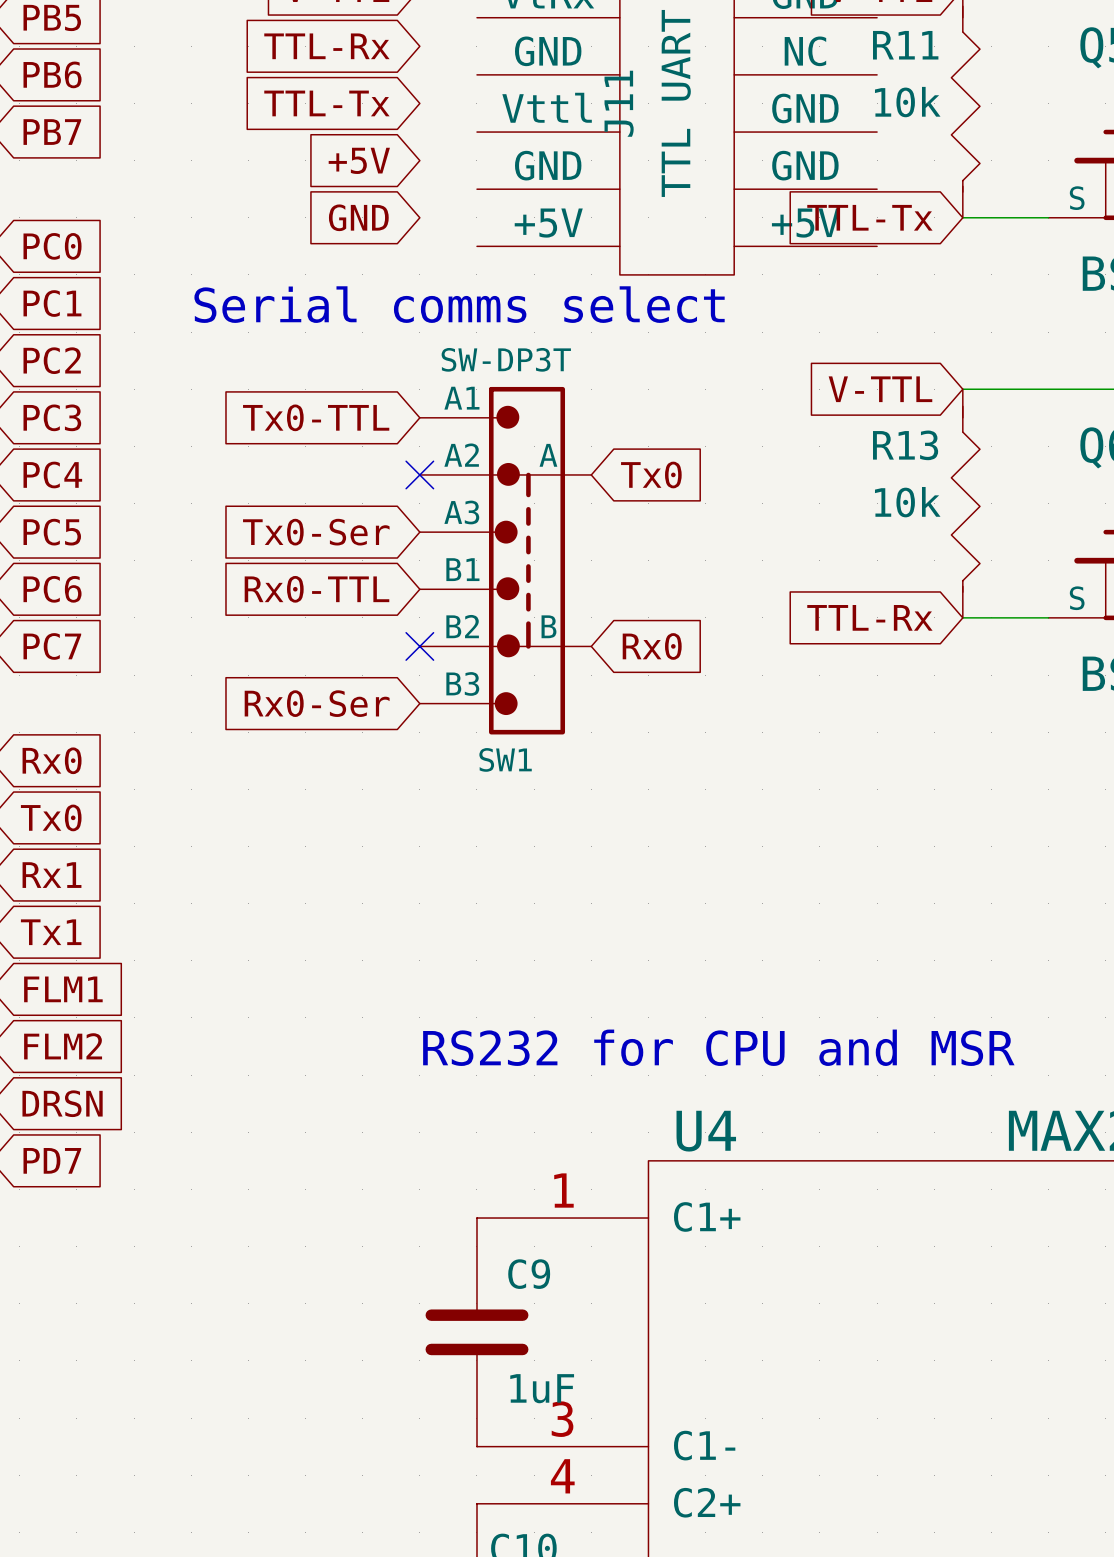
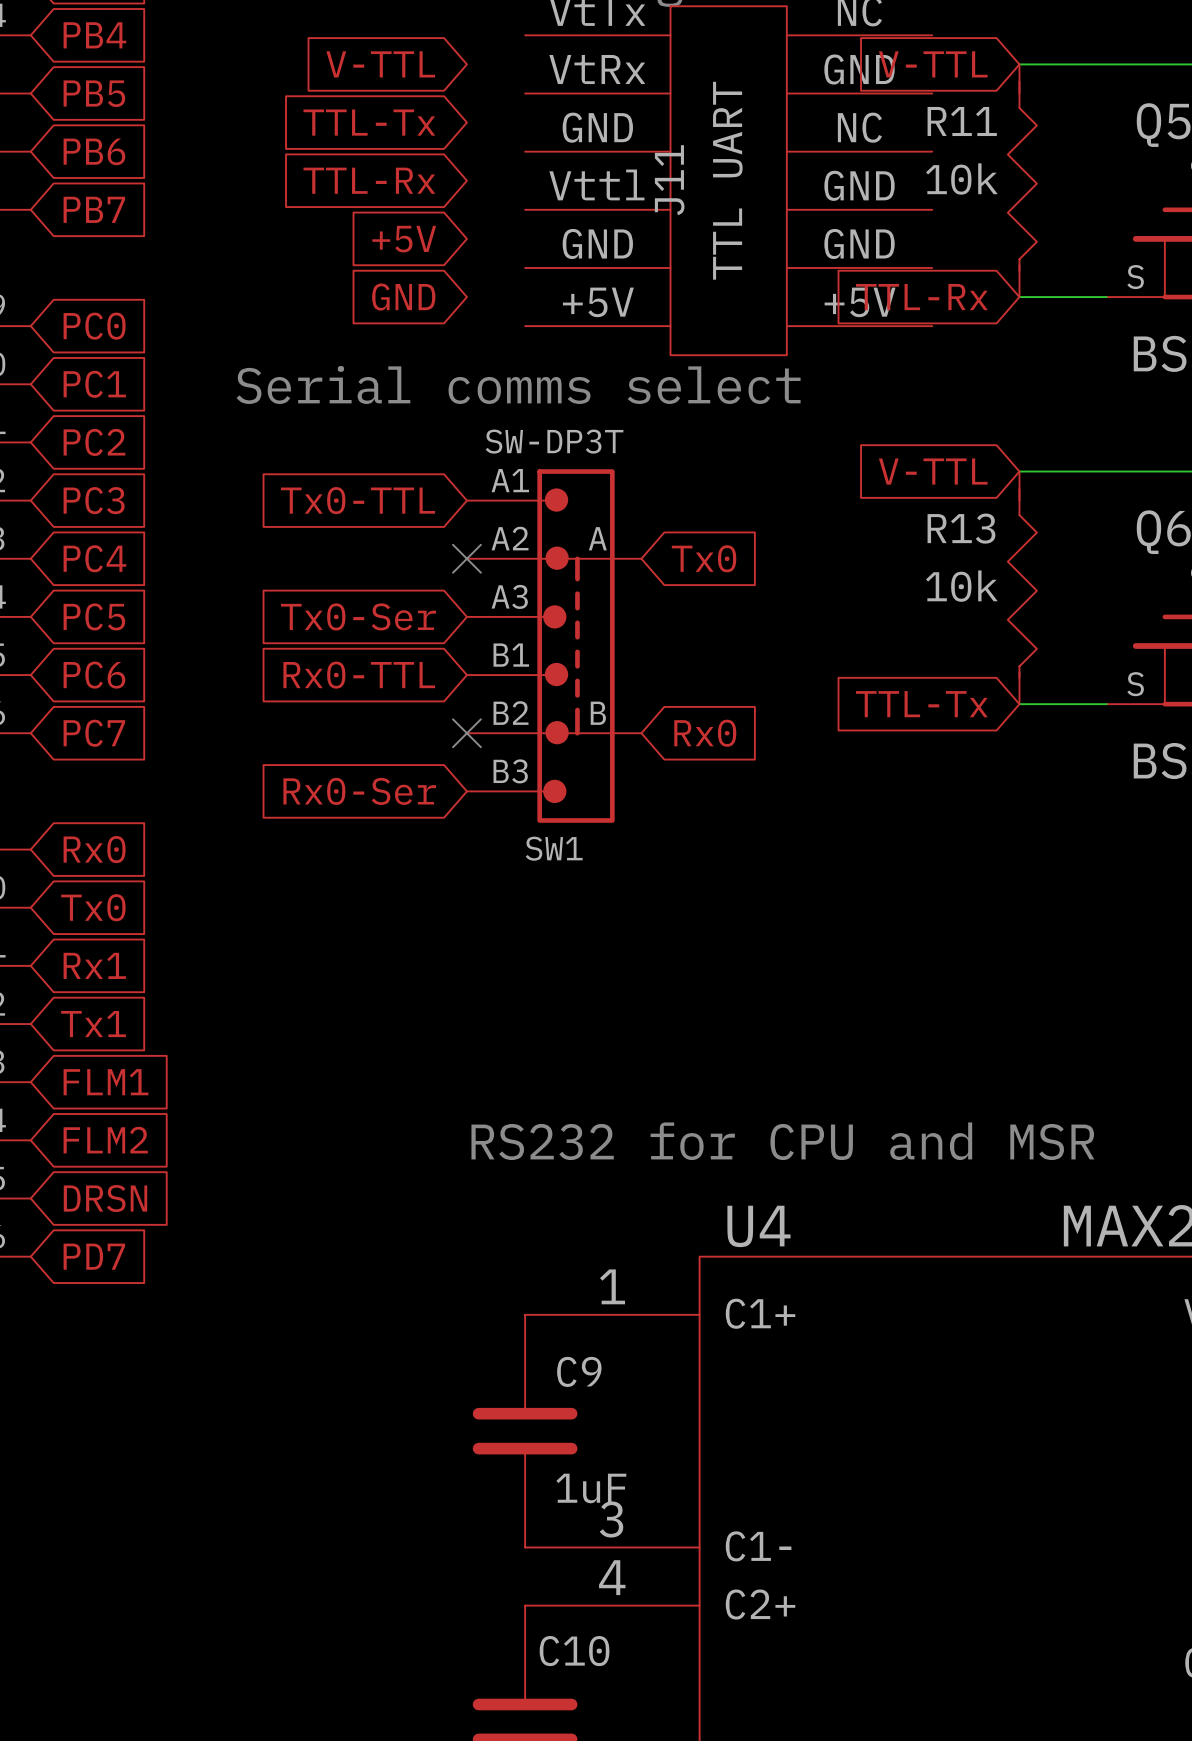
global label: TTL-Rx (326, 46) -> TTL-Tx (369, 122)
global label: TTL-Tx (326, 103) -> TTL-Rx (369, 180)
global label: TTL-Tx (869, 217) -> TTL-Rx (921, 297)
global label: TTL-Rx (869, 617) -> TTL-Tx (921, 704)

